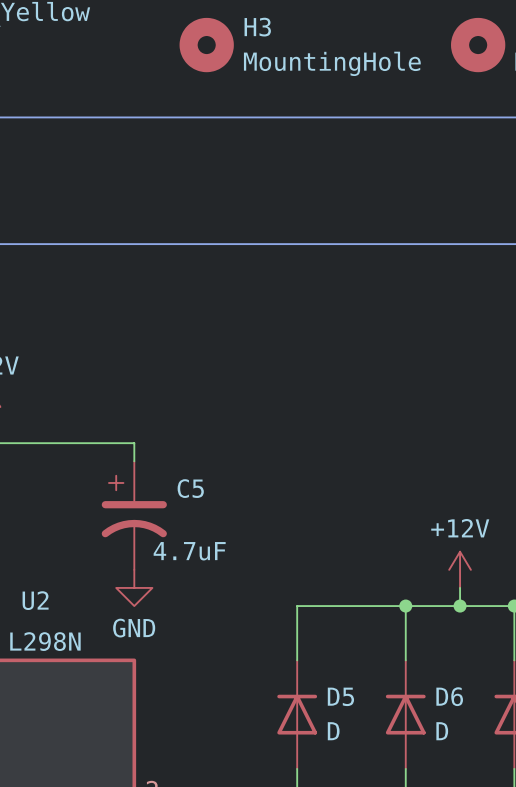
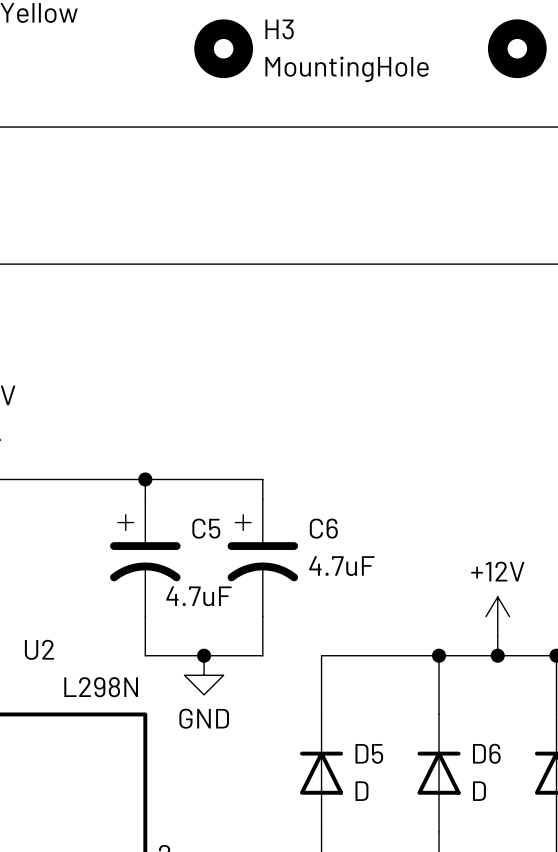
wire: none -> (145, 479) (262, 479) (262, 499)
junction: none -> (145, 479)
C6: none -> 4.7uF (262, 557)
wire: none -> (145, 616) (145, 655) (262, 655) (262, 616)
power symbol position: GND (134, 587) -> GND (204, 675)
junction: none -> (204, 655)
U2 value position: L298N (45, 641) -> L298N (101, 687)

